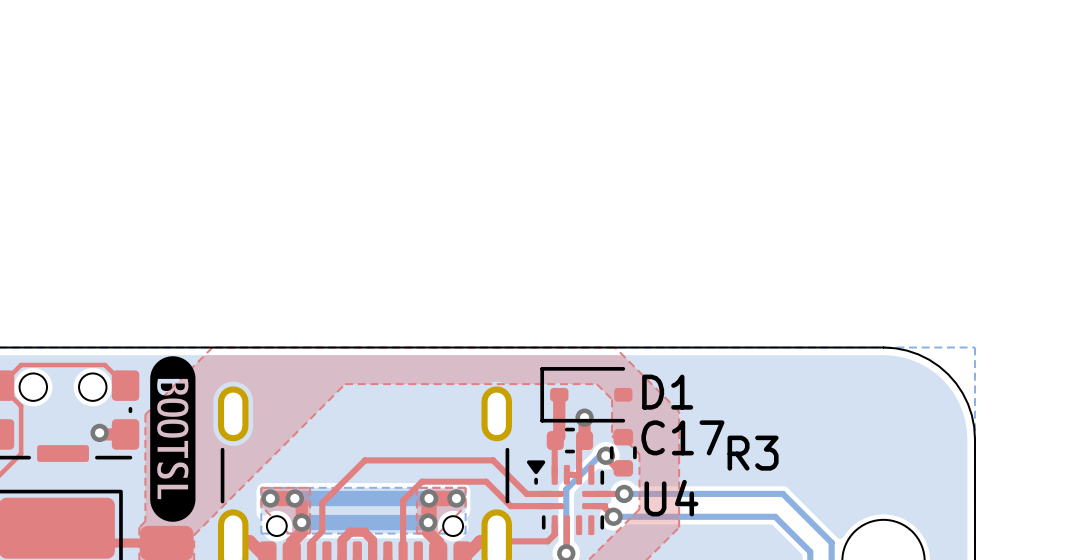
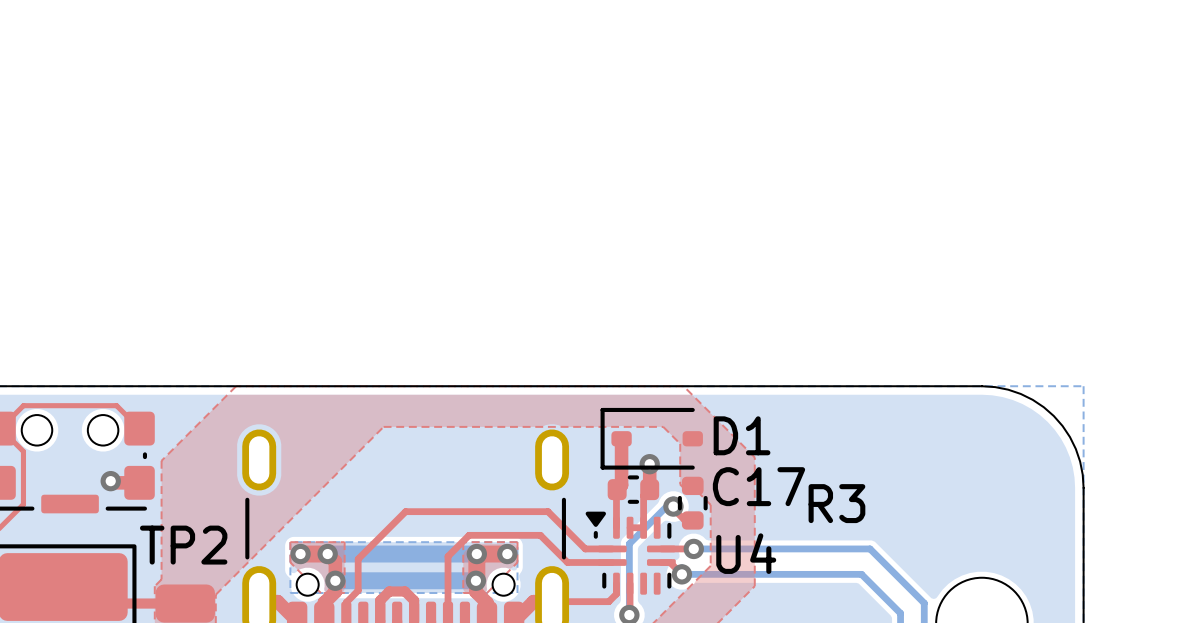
drawing: [150, 356, 196, 522] -> none
TP2 name: none -> TP2 (183, 545)

